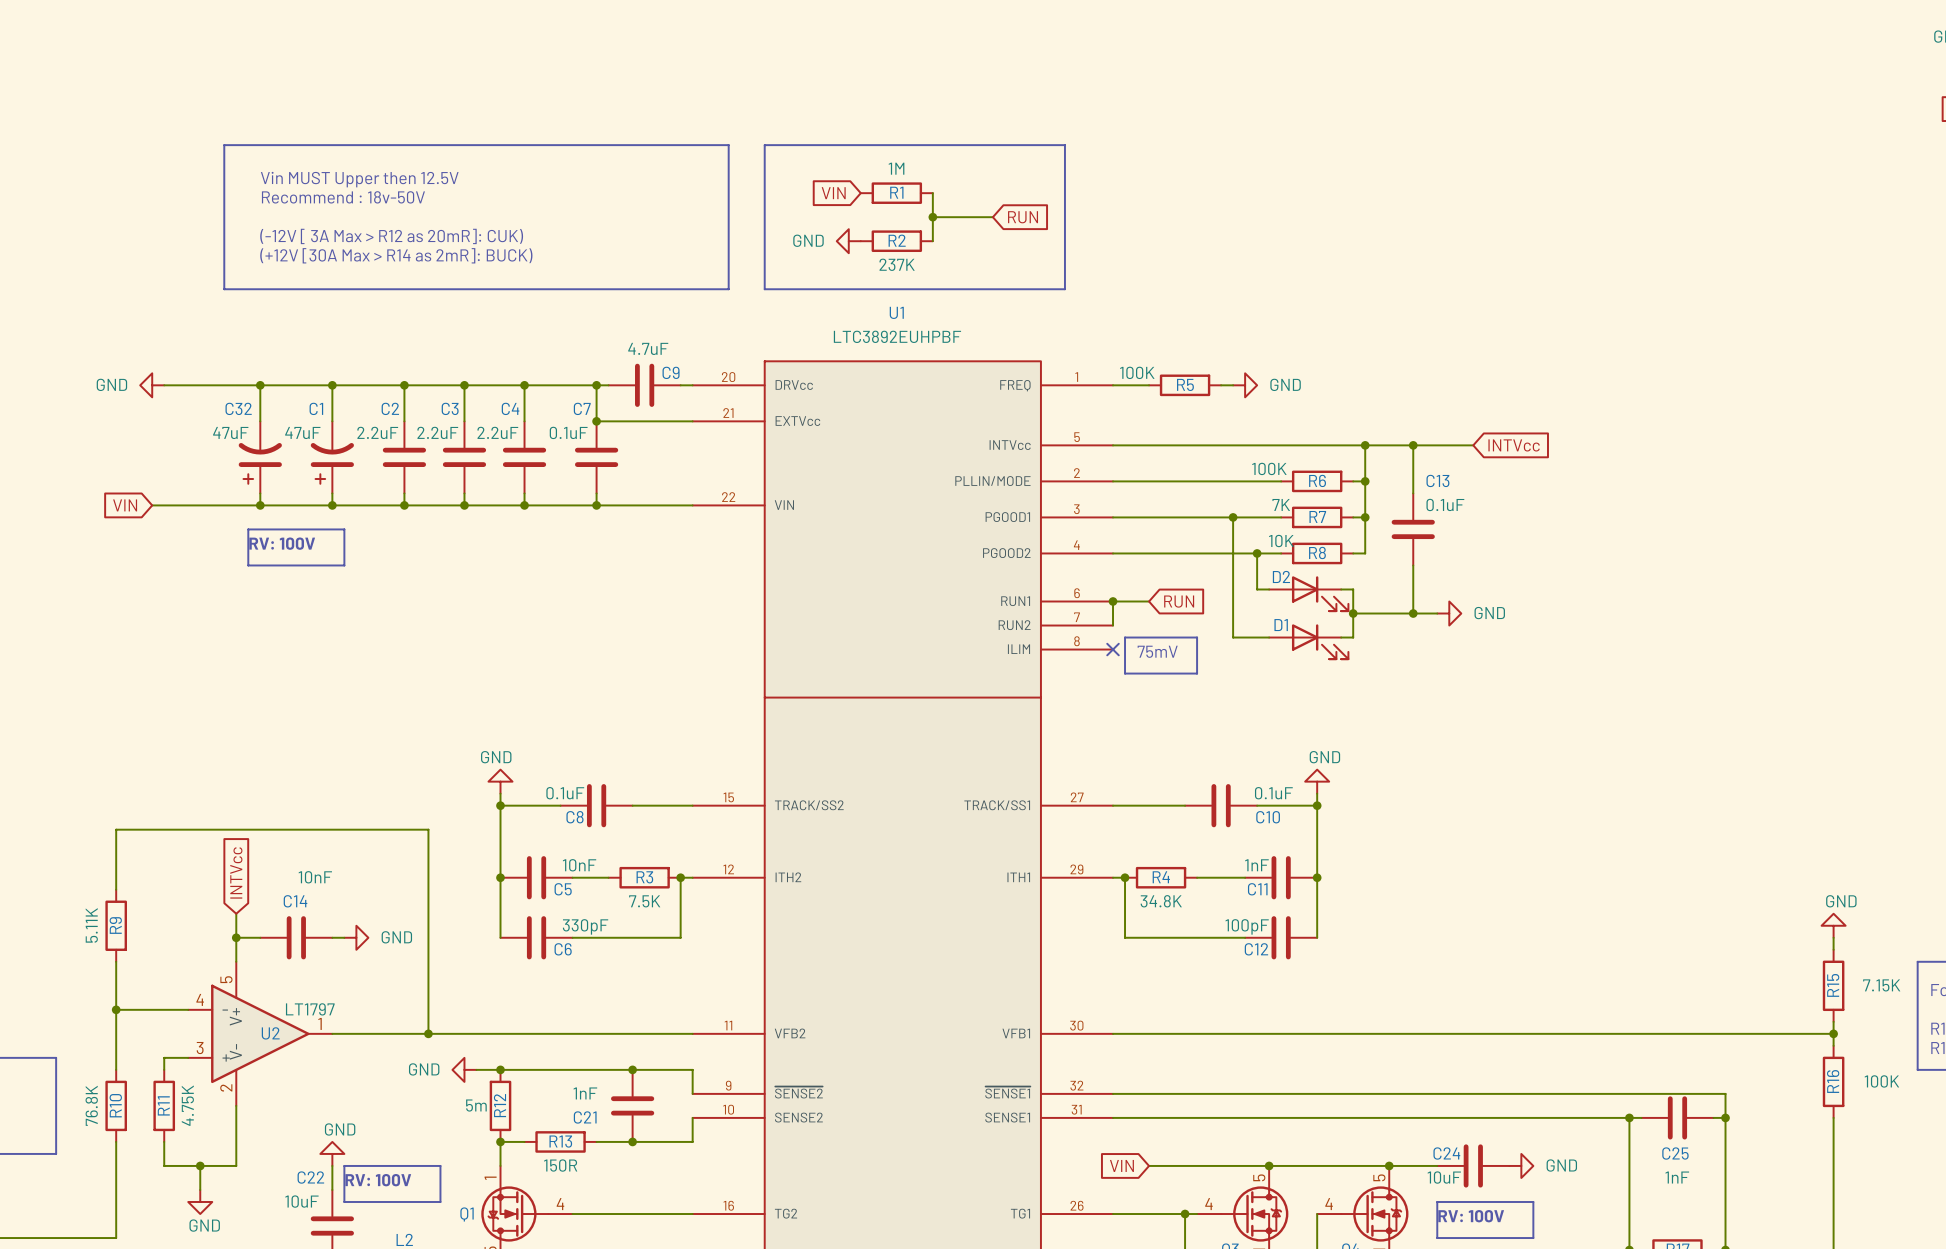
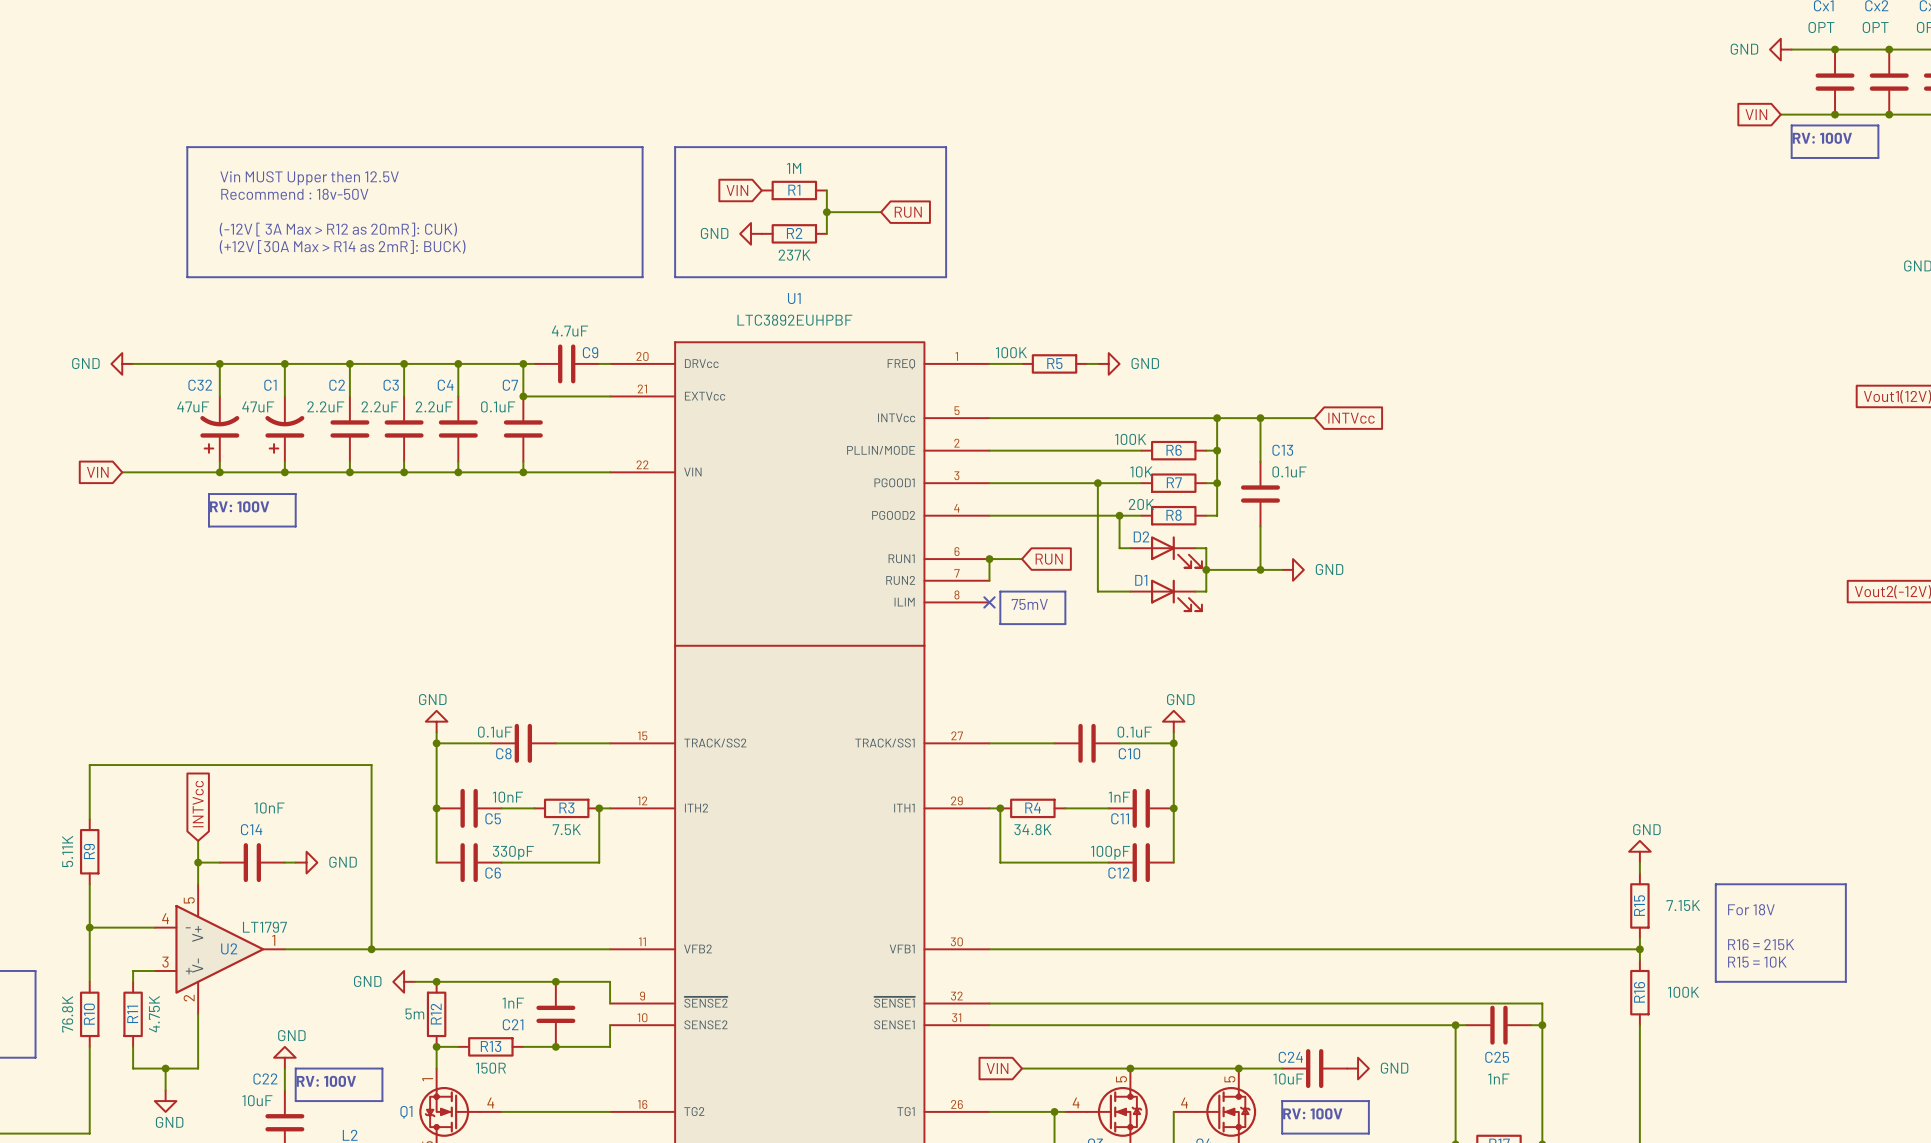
R7 value: 7K (1281, 504) -> 10K (1141, 471)
R8 value: 10K (1281, 541) -> 20K (1141, 504)

